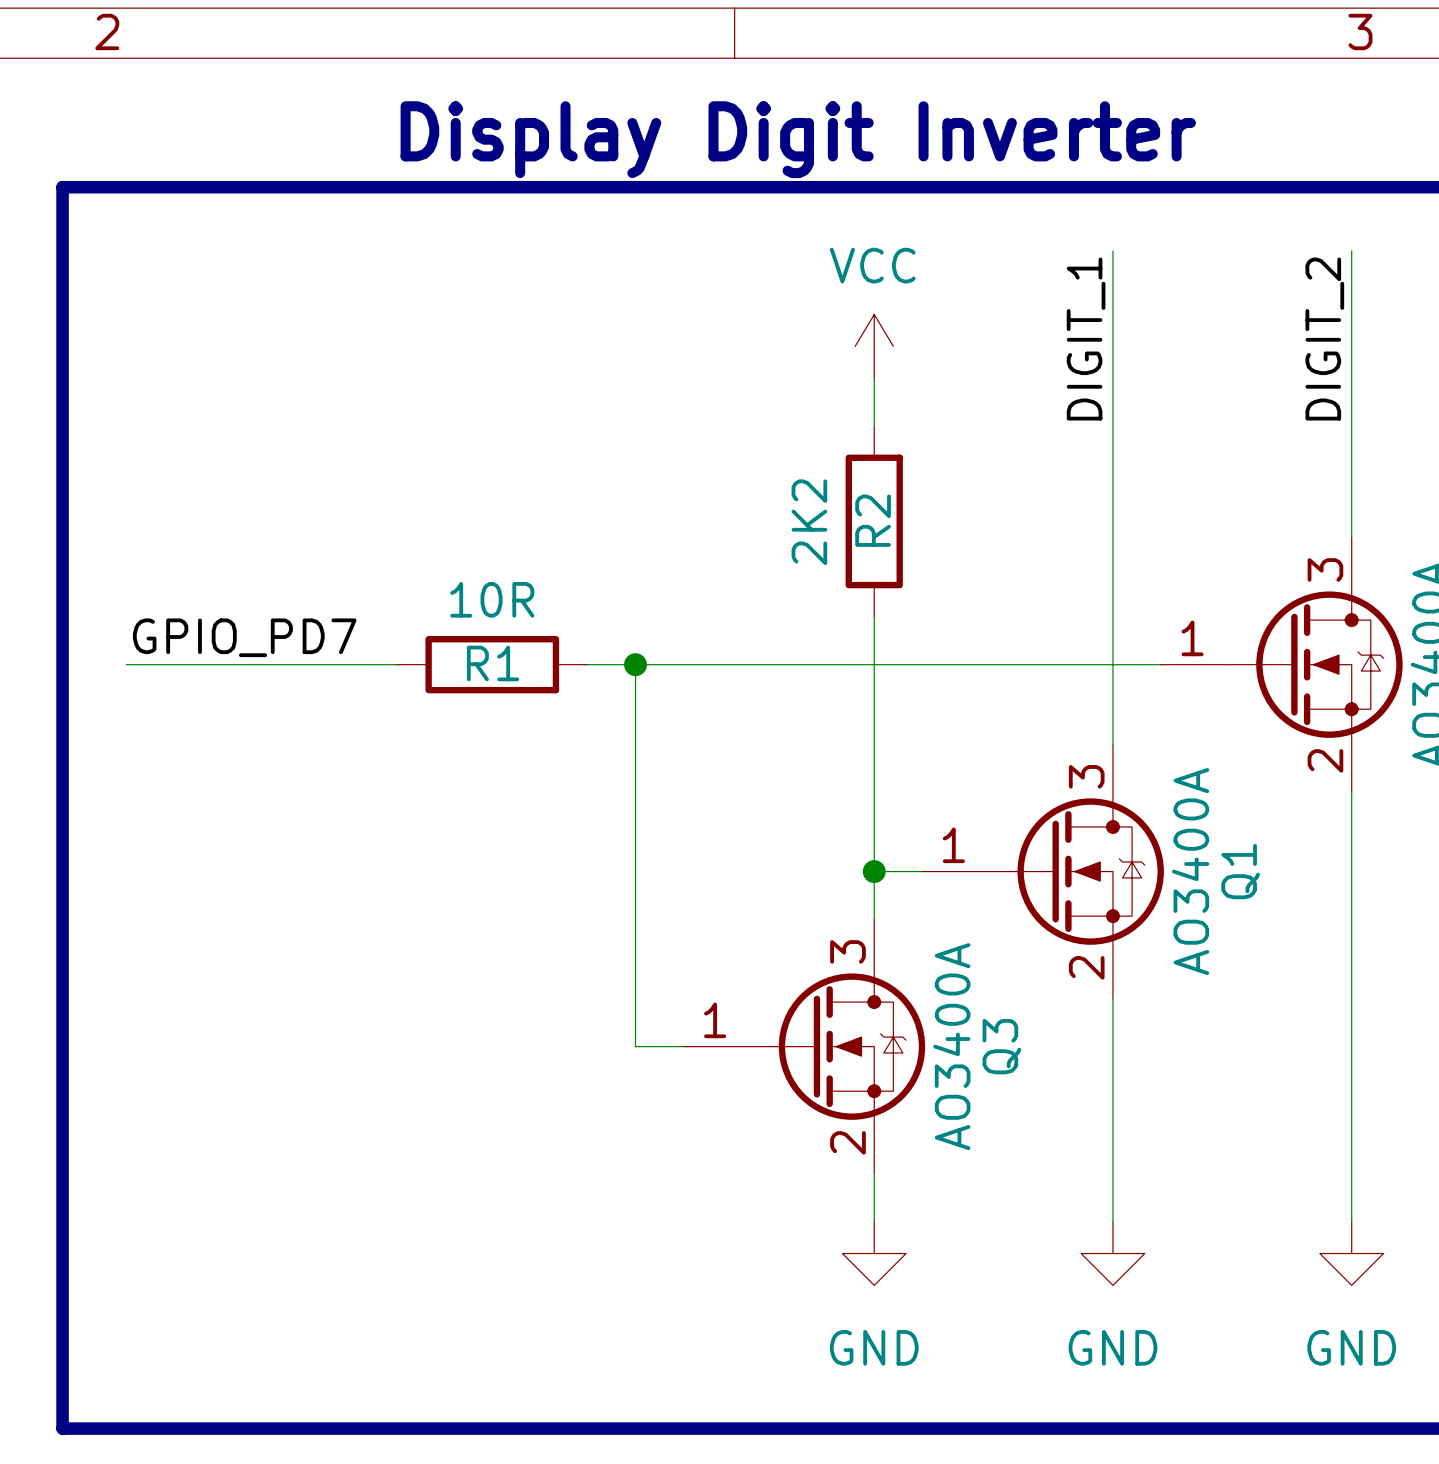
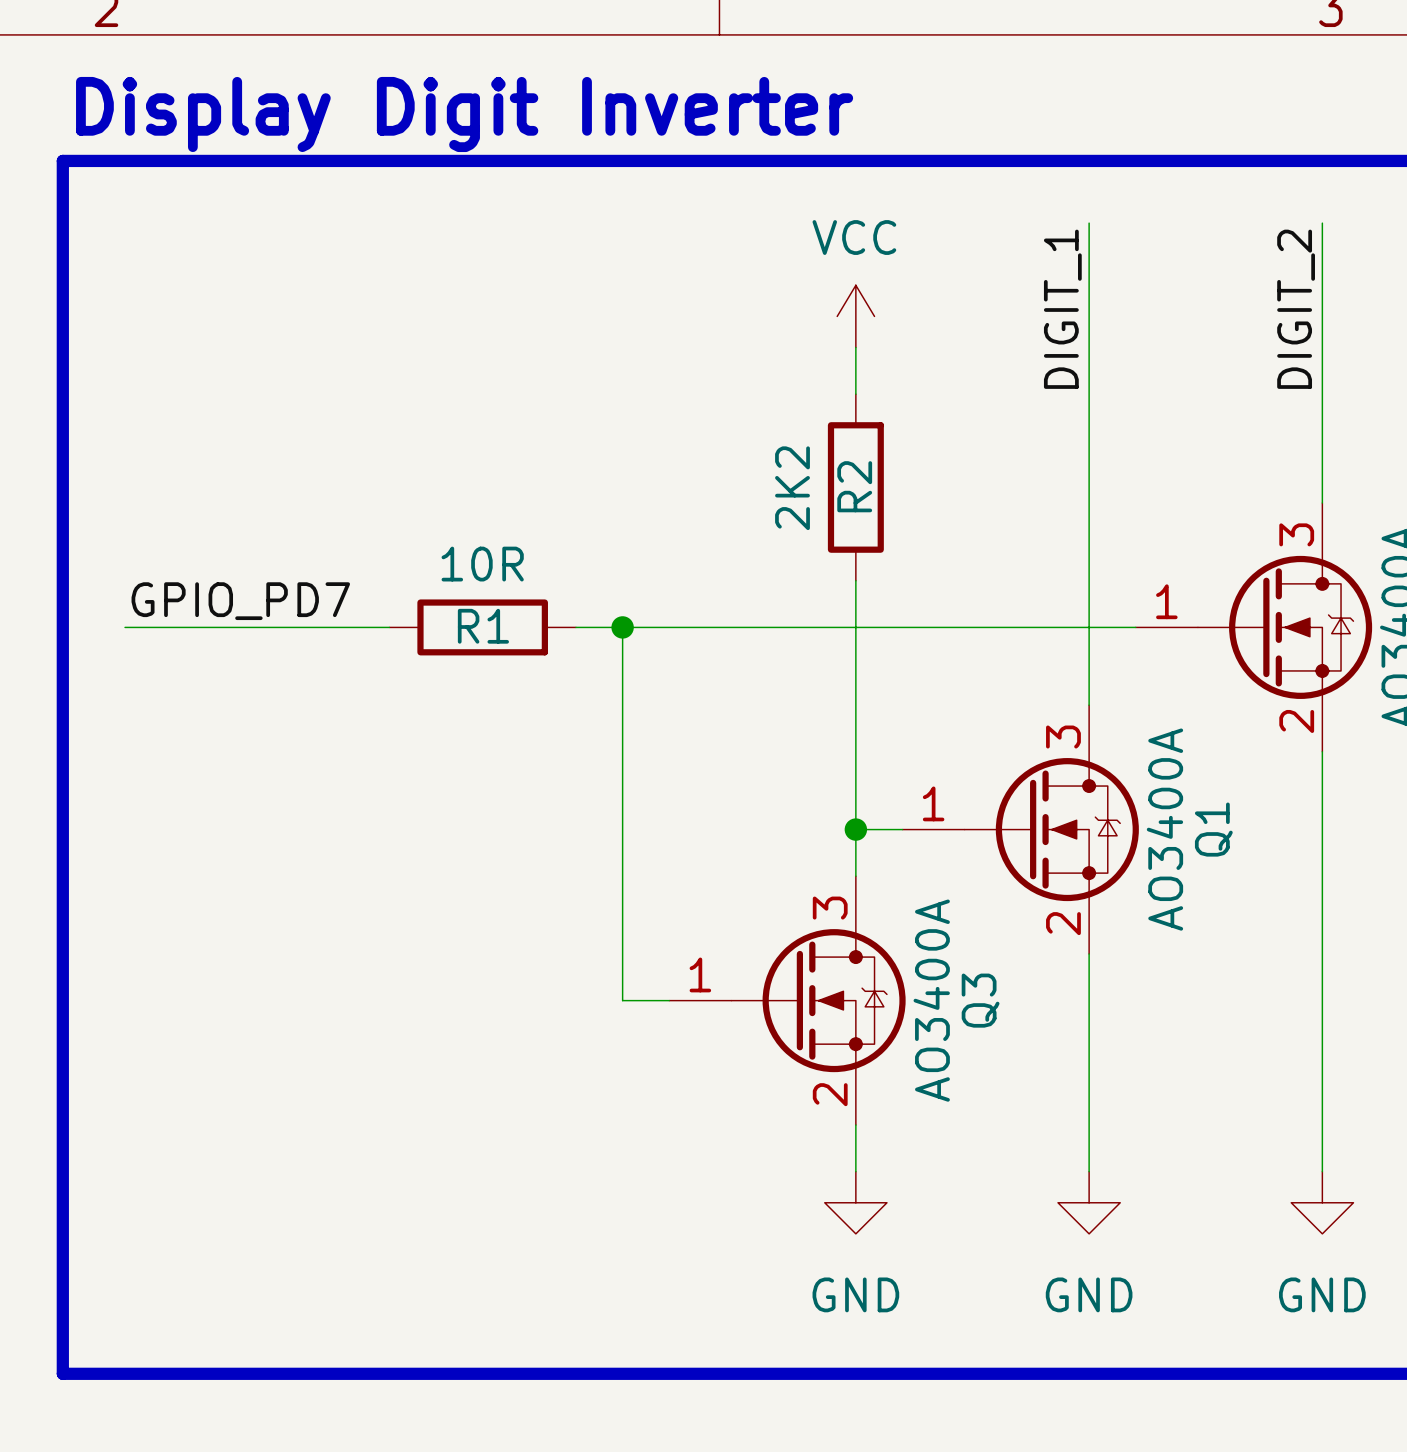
text: none -> Display Digit Inverter (464, 114)
text: Display Digit Inverter (798, 139) -> none

